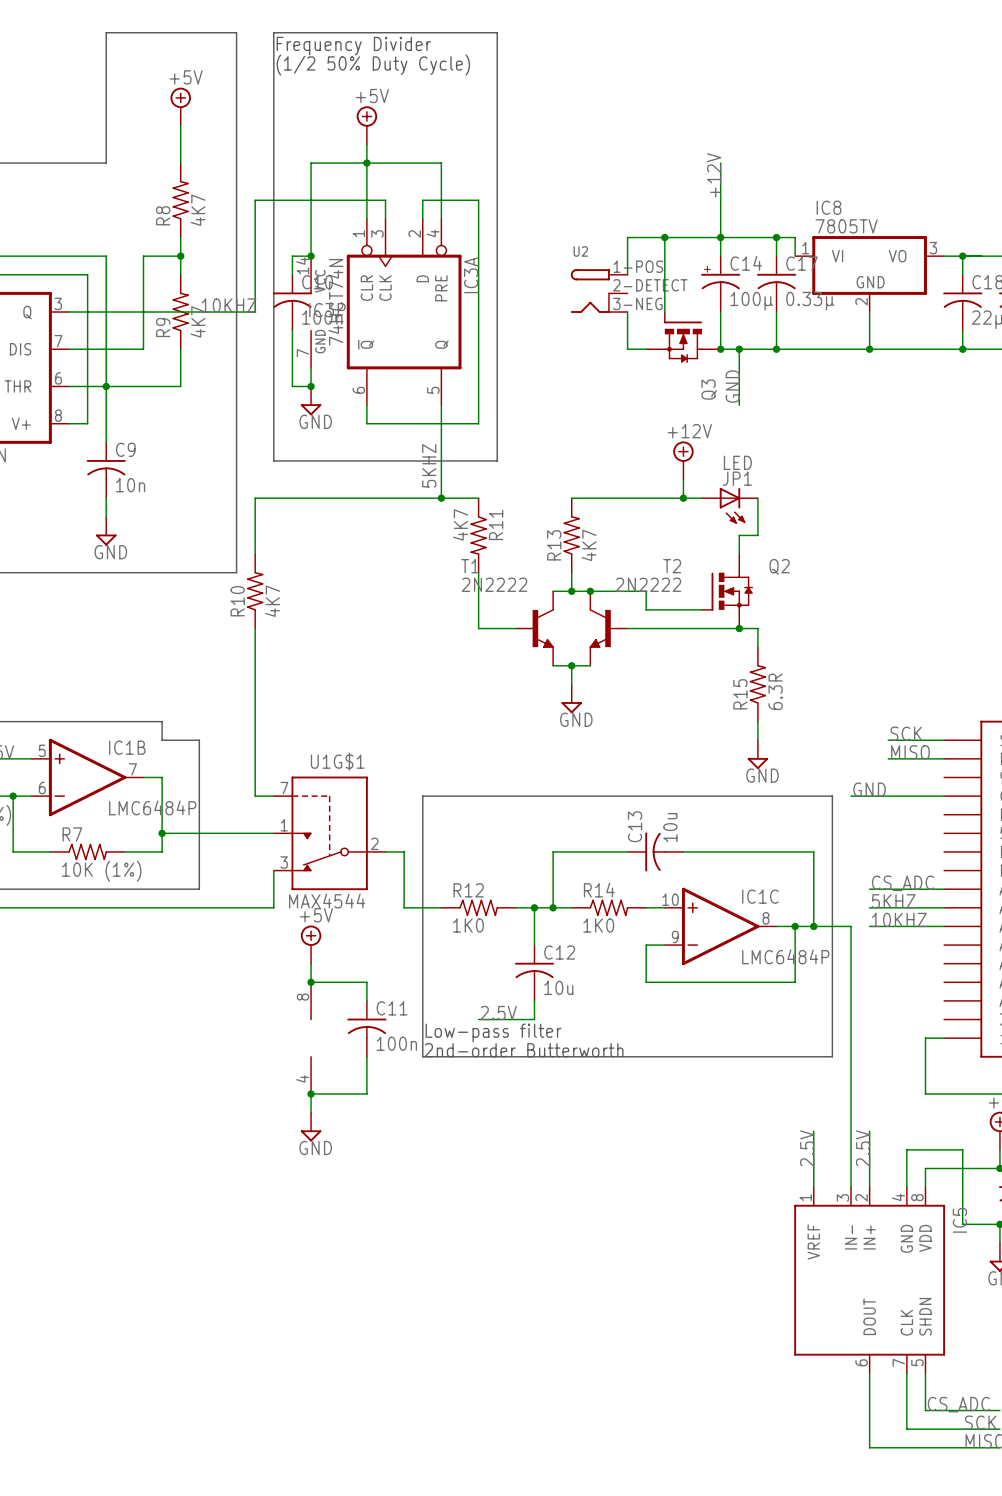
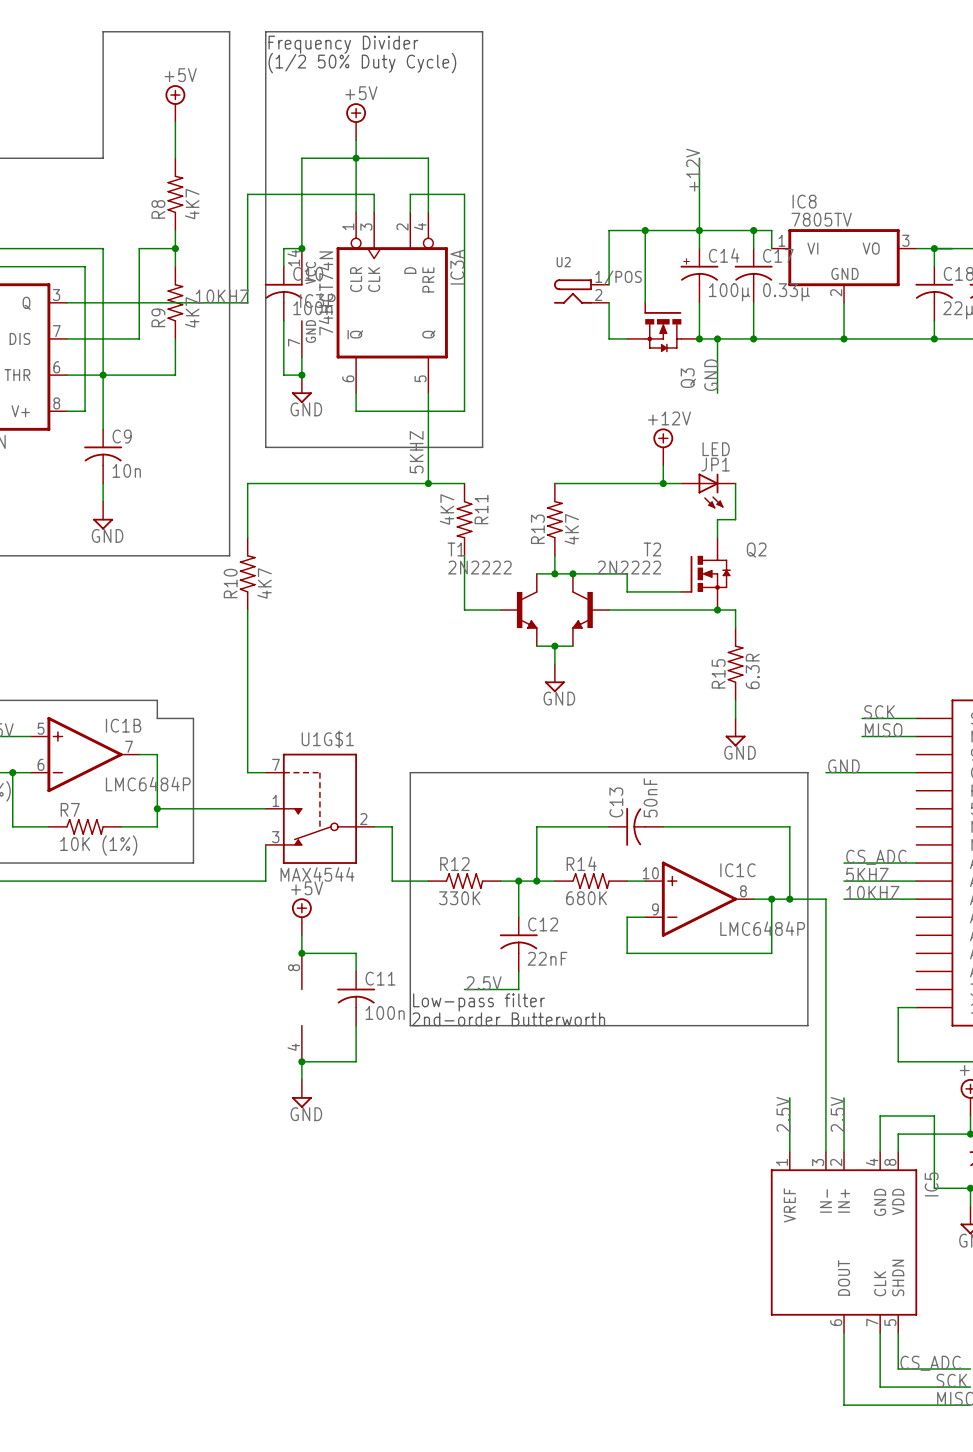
U2 symbol: [570, 269, 628, 313] -> [553, 279, 610, 304]
wire: none -> (609, 266) (609, 284)
C13 value: 10u (670, 827) -> 50nF (650, 797)
R12 value: 1K0 (468, 925) -> 330K (459, 898)
R14 value: 1K0 (598, 925) -> 680K (586, 898)
C12 value: 10u (558, 987) -> 22nF (547, 958)

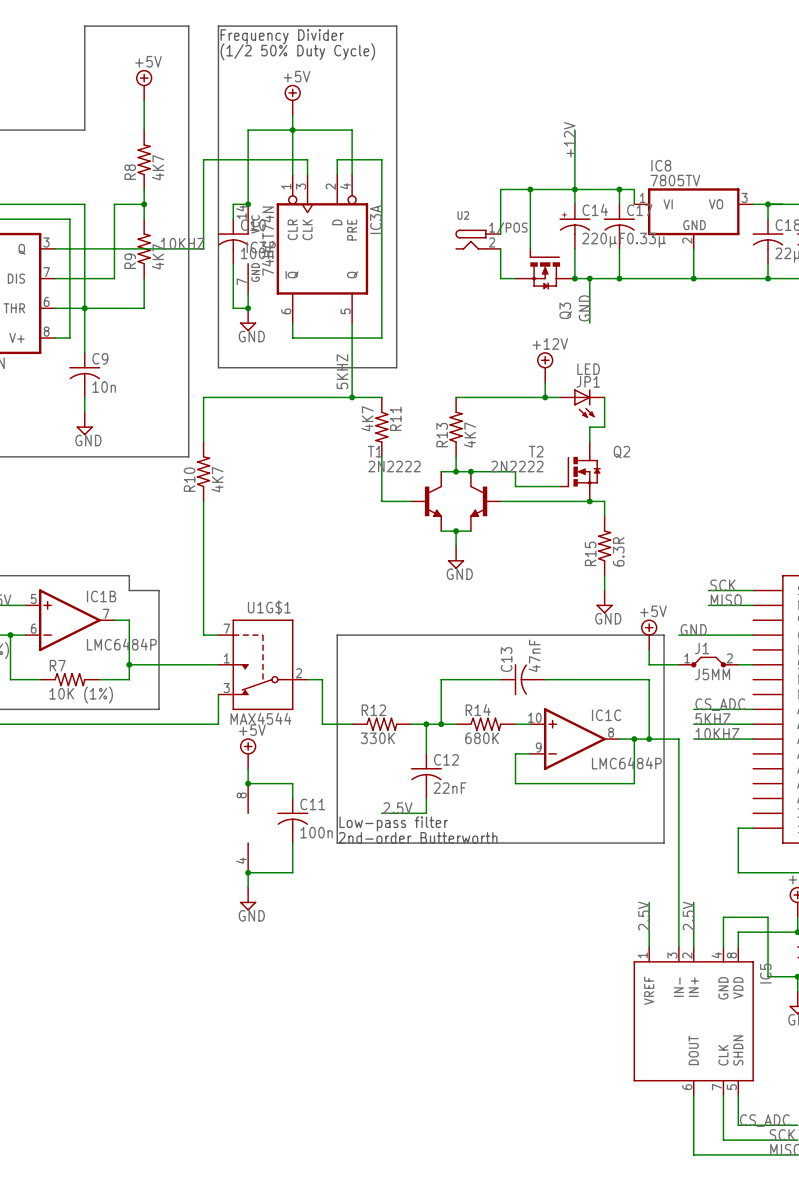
C14 value: 100µ (729, 292) -> 220µF (603, 240)
power symbol: none -> +5V (649, 634)
wire: none -> (649, 649) (649, 664) (678, 664)
C13 value: 50nF (650, 797) -> 47nF (534, 655)
J1: none -> J5MM (708, 662)
wire: none -> (738, 664) (753, 664)

